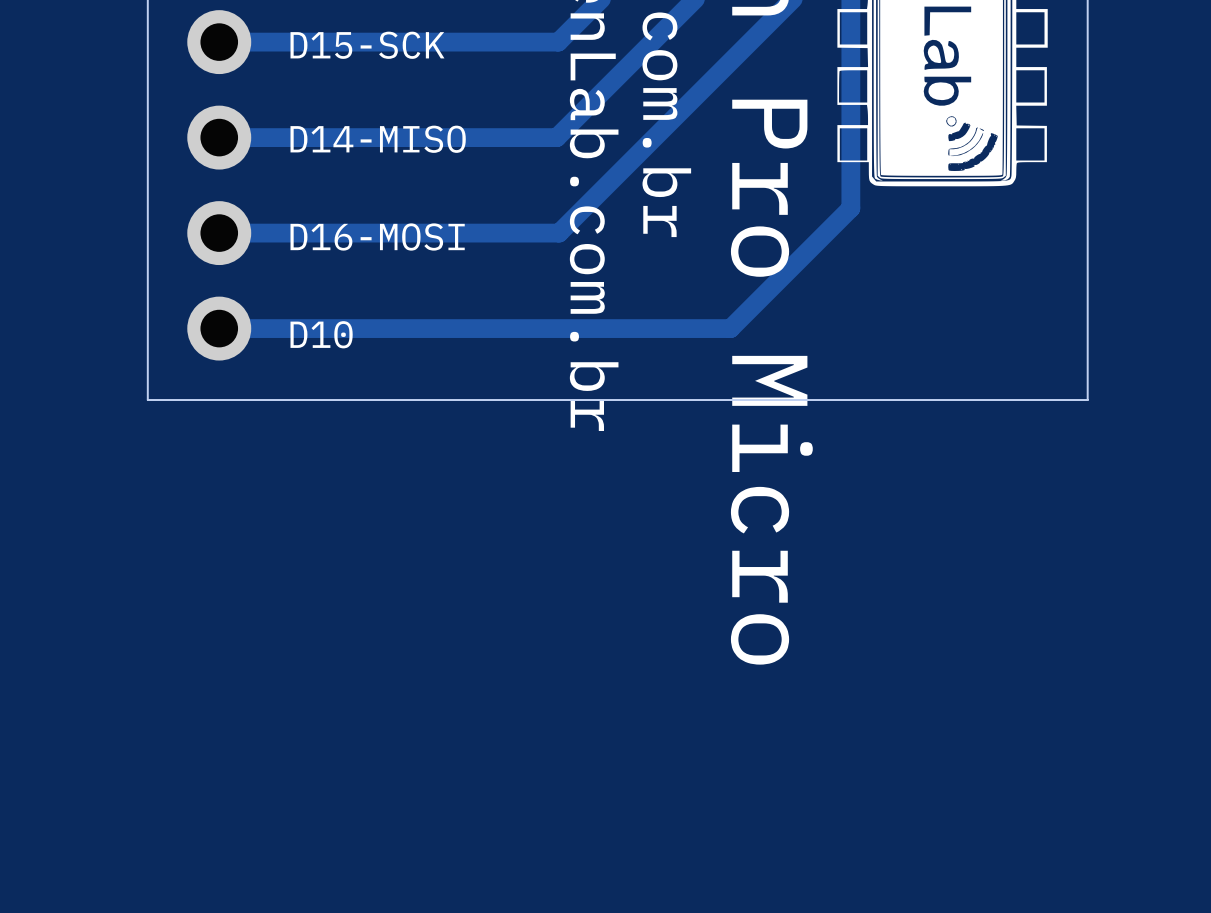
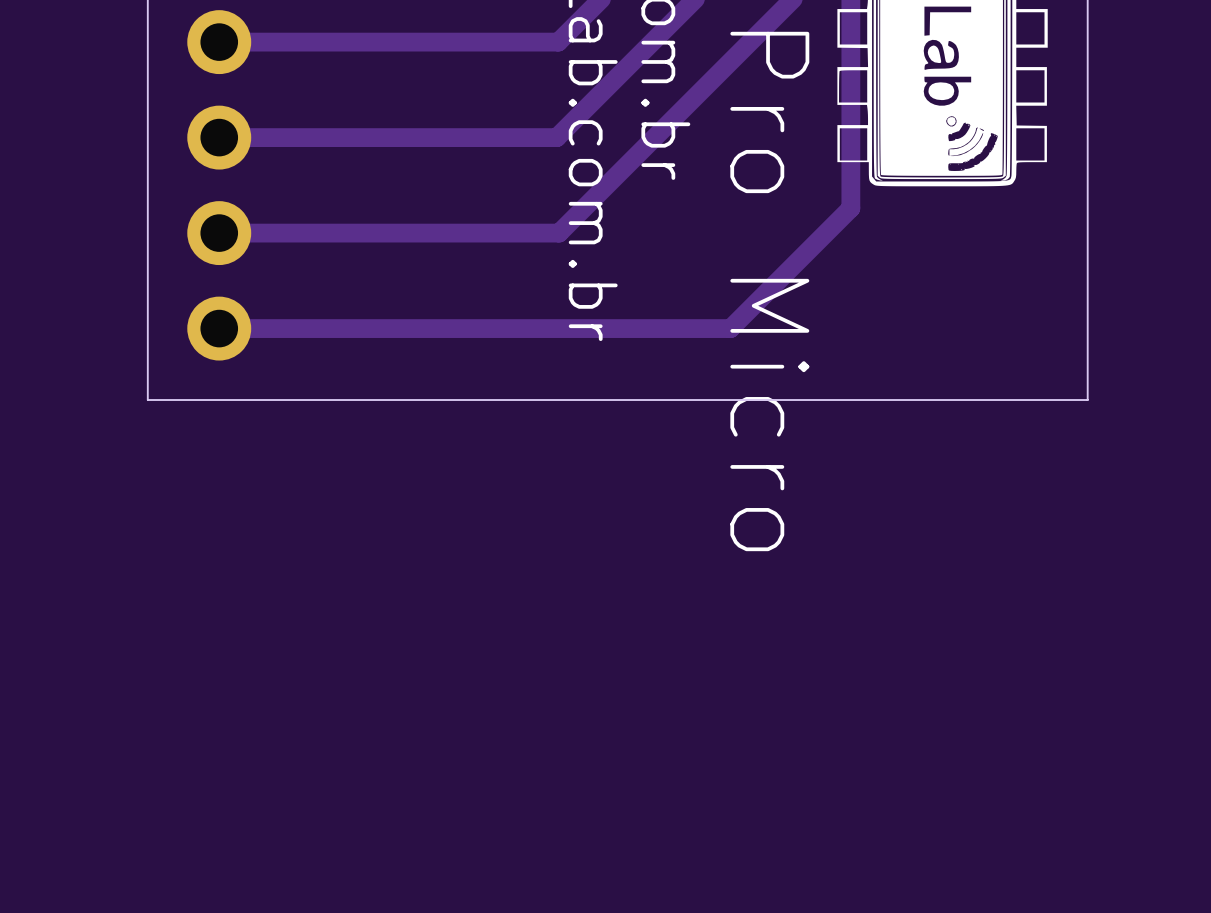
text: D15-SCK (367, 45) -> none
text: D14-MISO (378, 139) -> none
text: D16-MOSI (377, 237) -> none
text: D10 (321, 334) -> none

